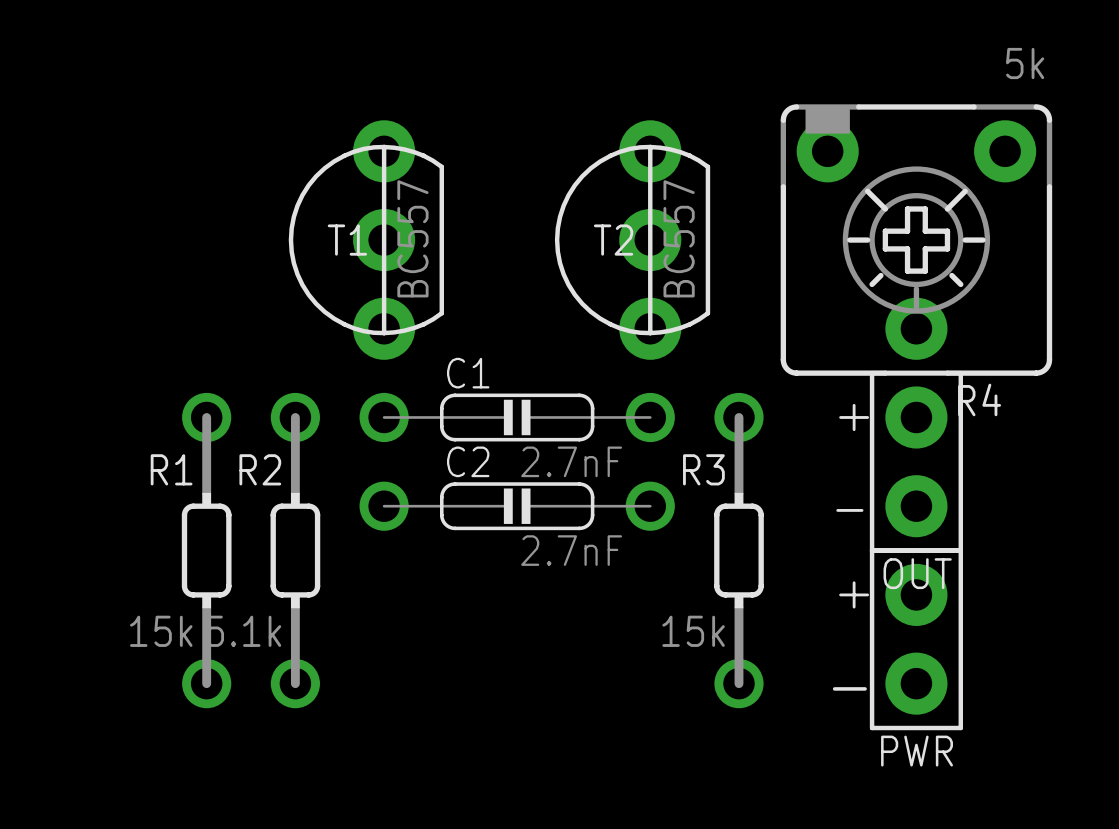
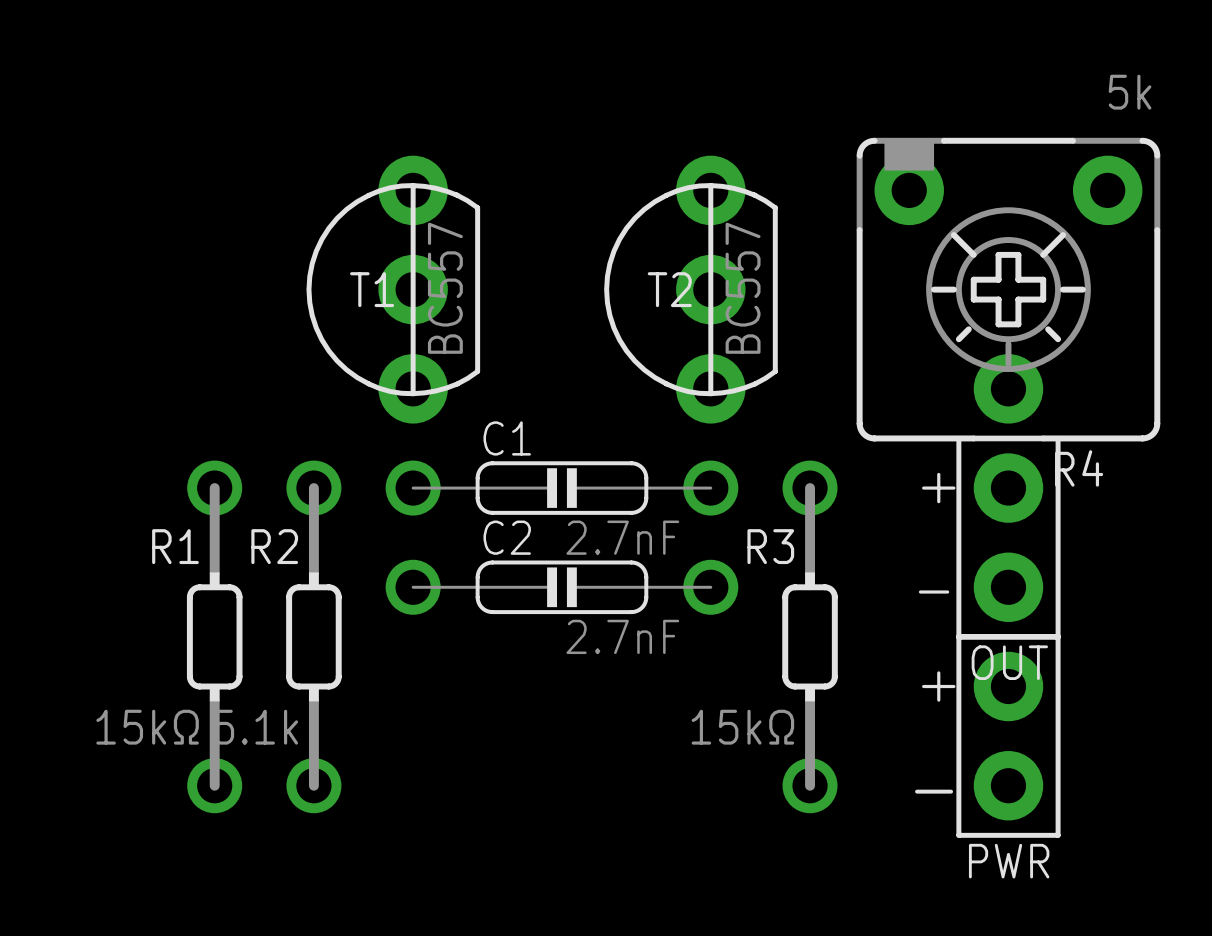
R1 value: 15k (161, 631) -> 15kΩ (147, 727)
R3 value: 15k (693, 631) -> 15kΩ (742, 727)

